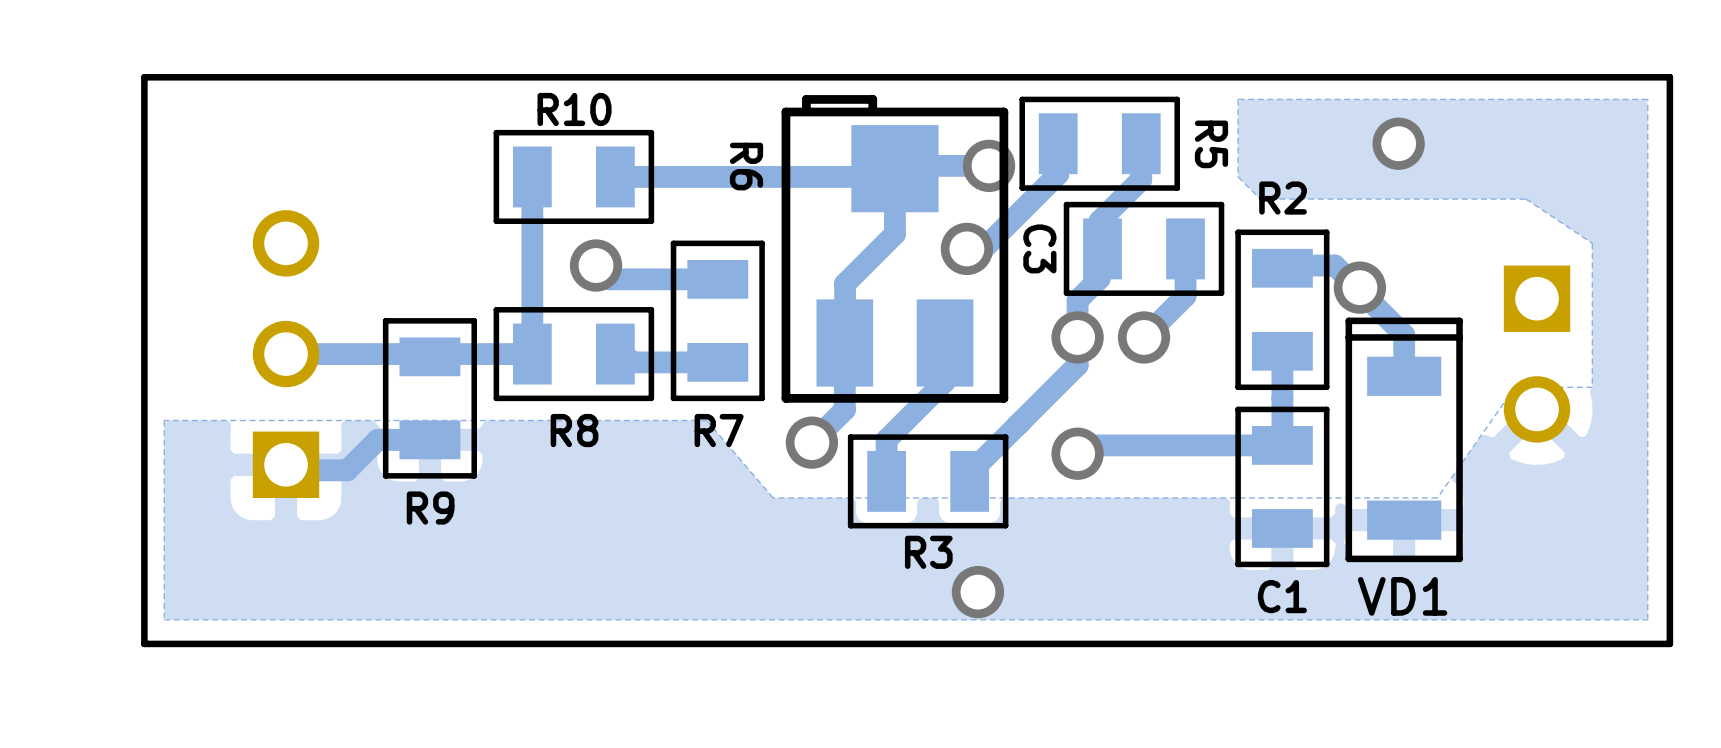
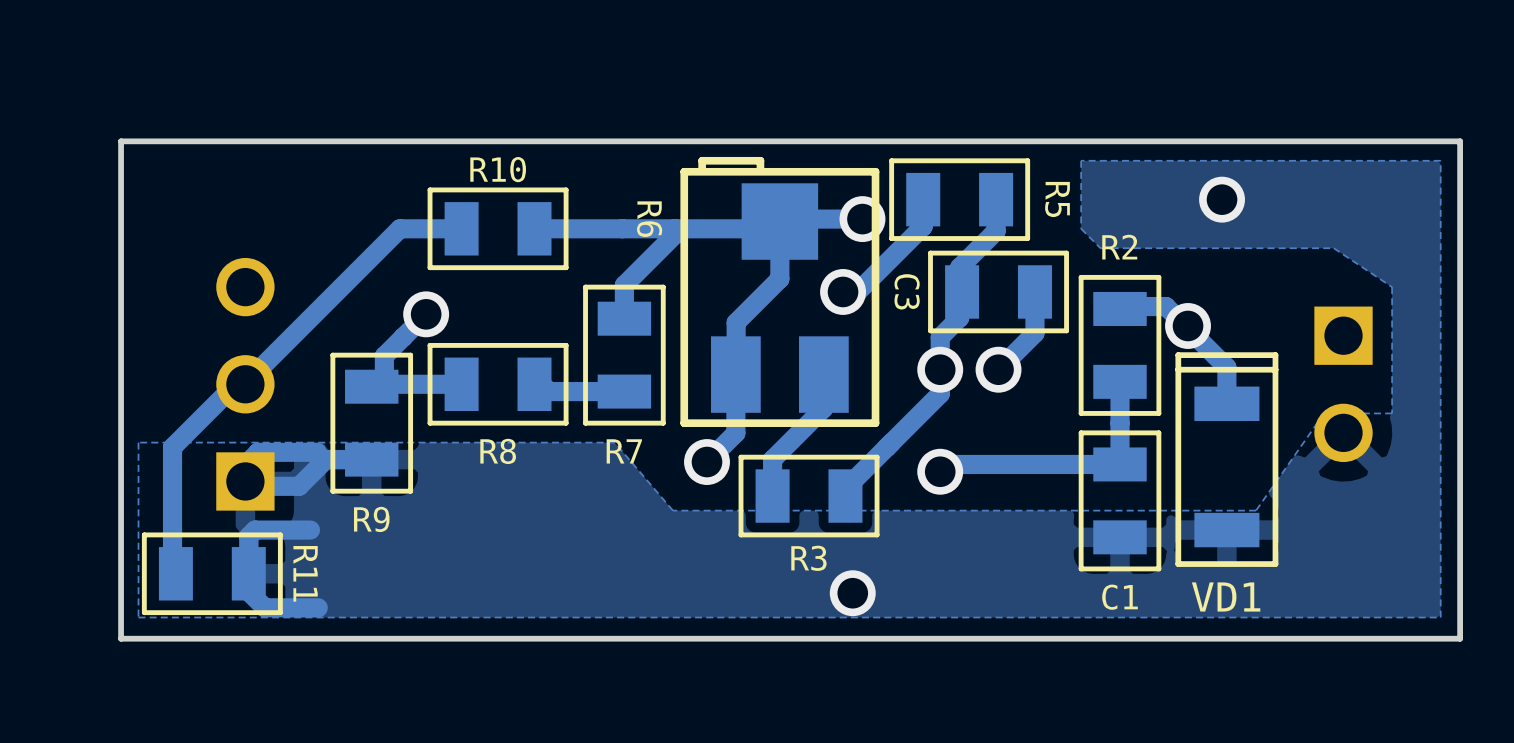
track: none -> (461, 228) (399, 228) (243, 385)
track: (532, 179) (532, 354) -> none
track: (596, 265) (609, 279) (717, 279) -> (674, 228) (674, 234) (624, 285) (624, 318)
via position: (596, 265) -> (426, 314)
track: none -> (426, 314) (384, 356) (384, 381)
track: (429, 354) (286, 354) -> (172, 579) (172, 447) (235, 384) (245, 384)
track: none -> (317, 452) (258, 452) (245, 464) (245, 481)
track: none -> (310, 530) (255, 530) (248, 536) (248, 591) (264, 607) (318, 607)
R11: none -> (212, 573)

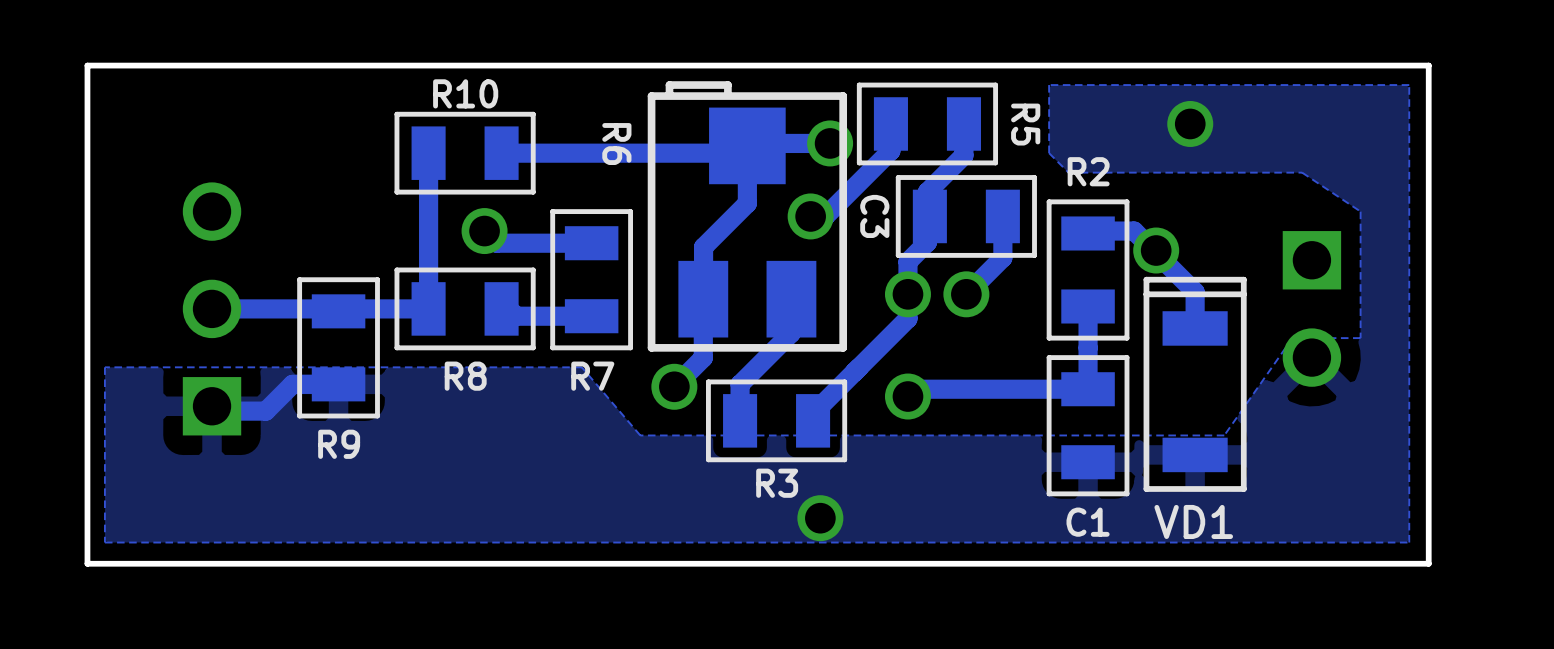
track: (461, 228) (399, 228) (243, 385) -> none
track: (674, 228) (674, 234) (624, 285) (624, 318) -> (484, 231) (496, 243) (591, 243)
track: none -> (428, 155) (428, 308)
track: (426, 314) (384, 356) (384, 381) -> none
via position: (426, 314) -> (484, 231)
track: (245, 384) (235, 384) (172, 447) (172, 579) -> (212, 308) (338, 308)
track: (317, 452) (258, 452) (245, 464) (245, 481) -> none
track: (310, 530) (255, 530) (248, 536) (248, 591) (264, 607) (318, 607) -> none
R11: (212, 573) -> none

